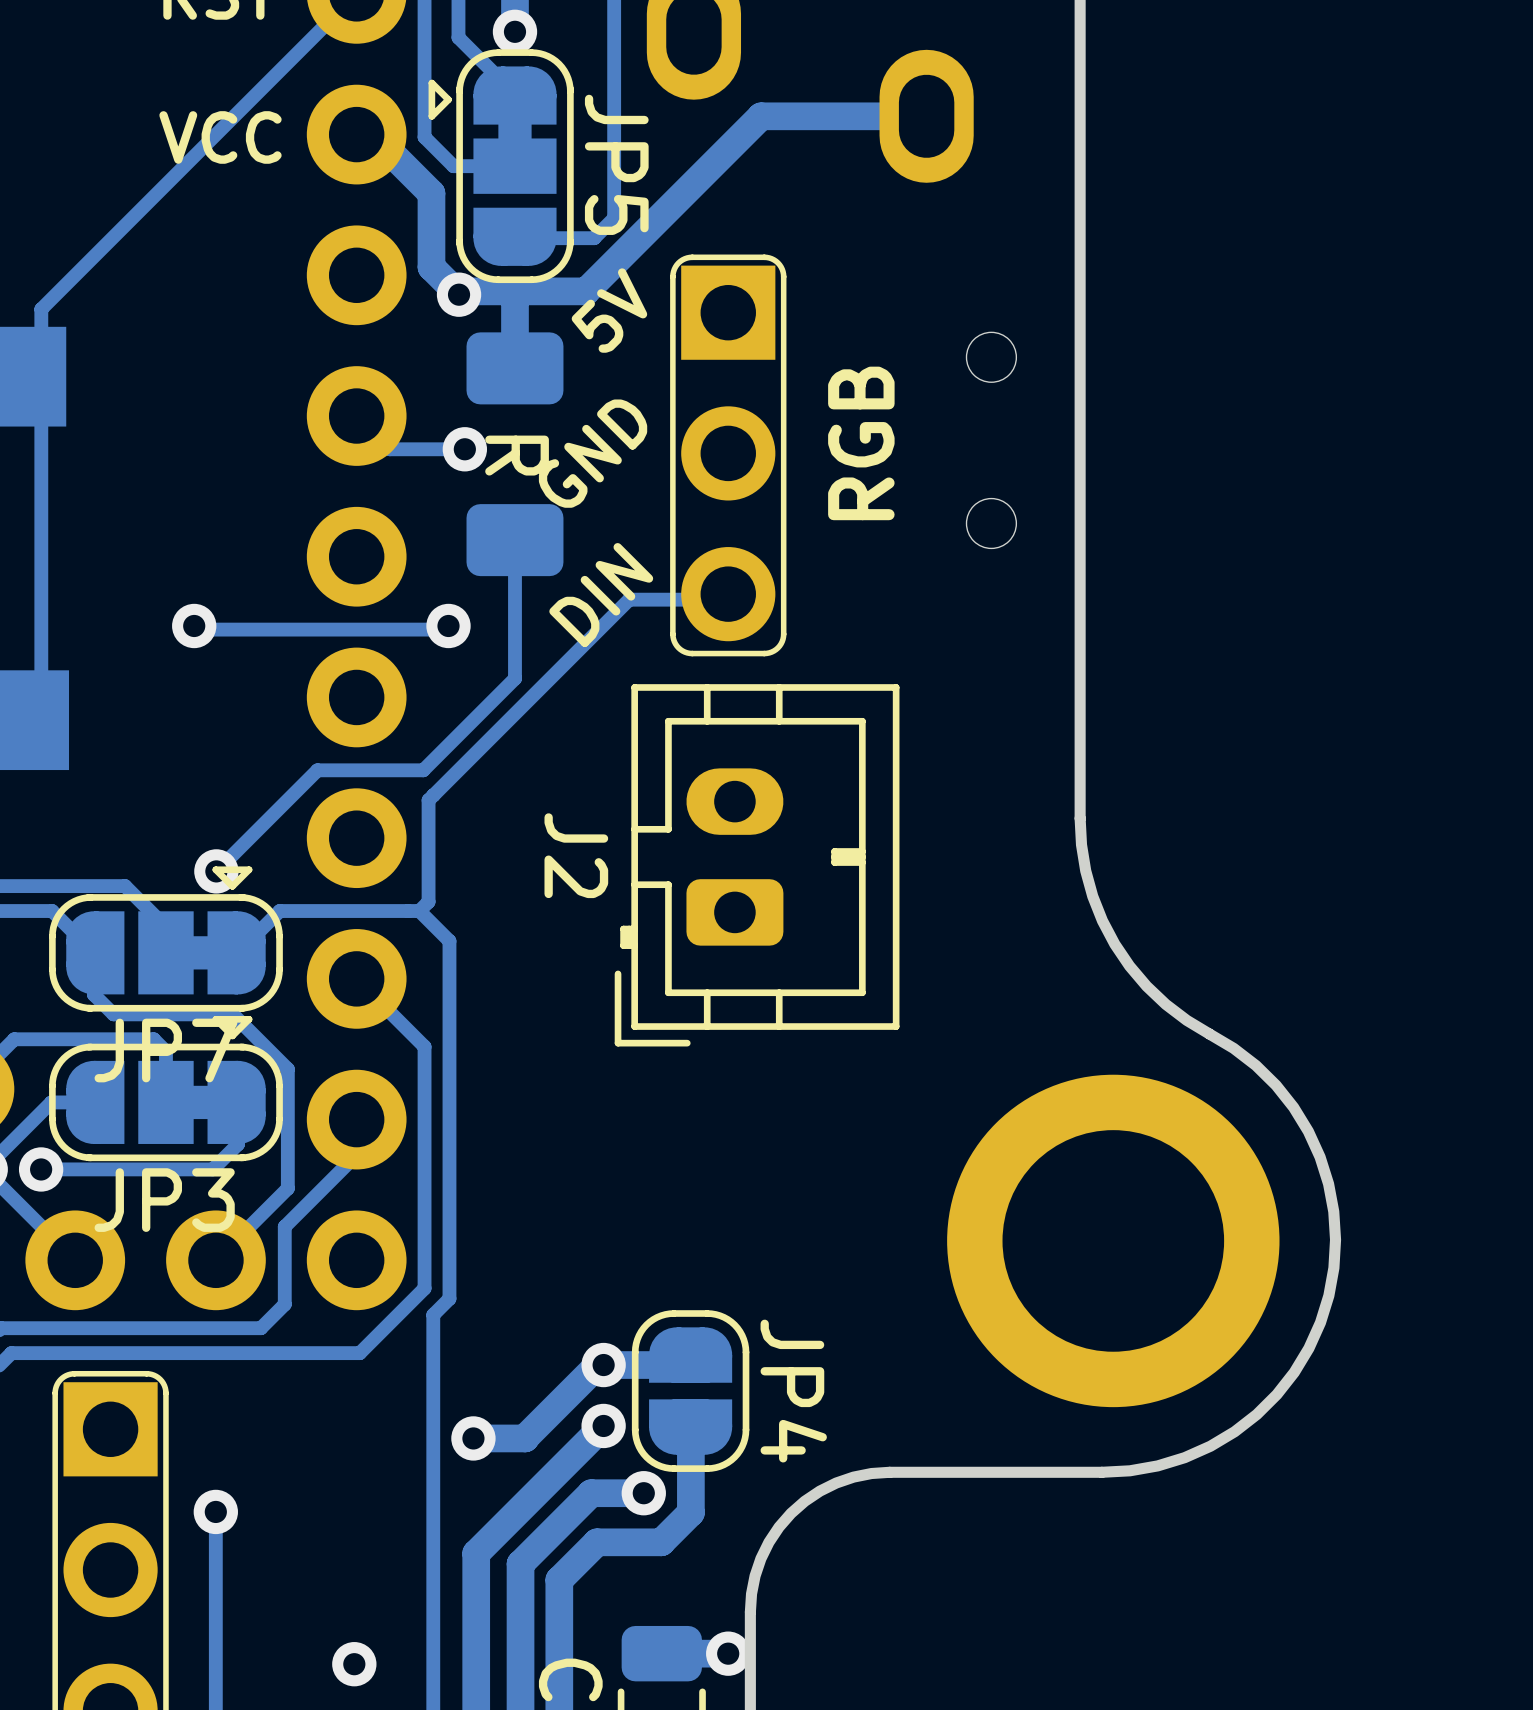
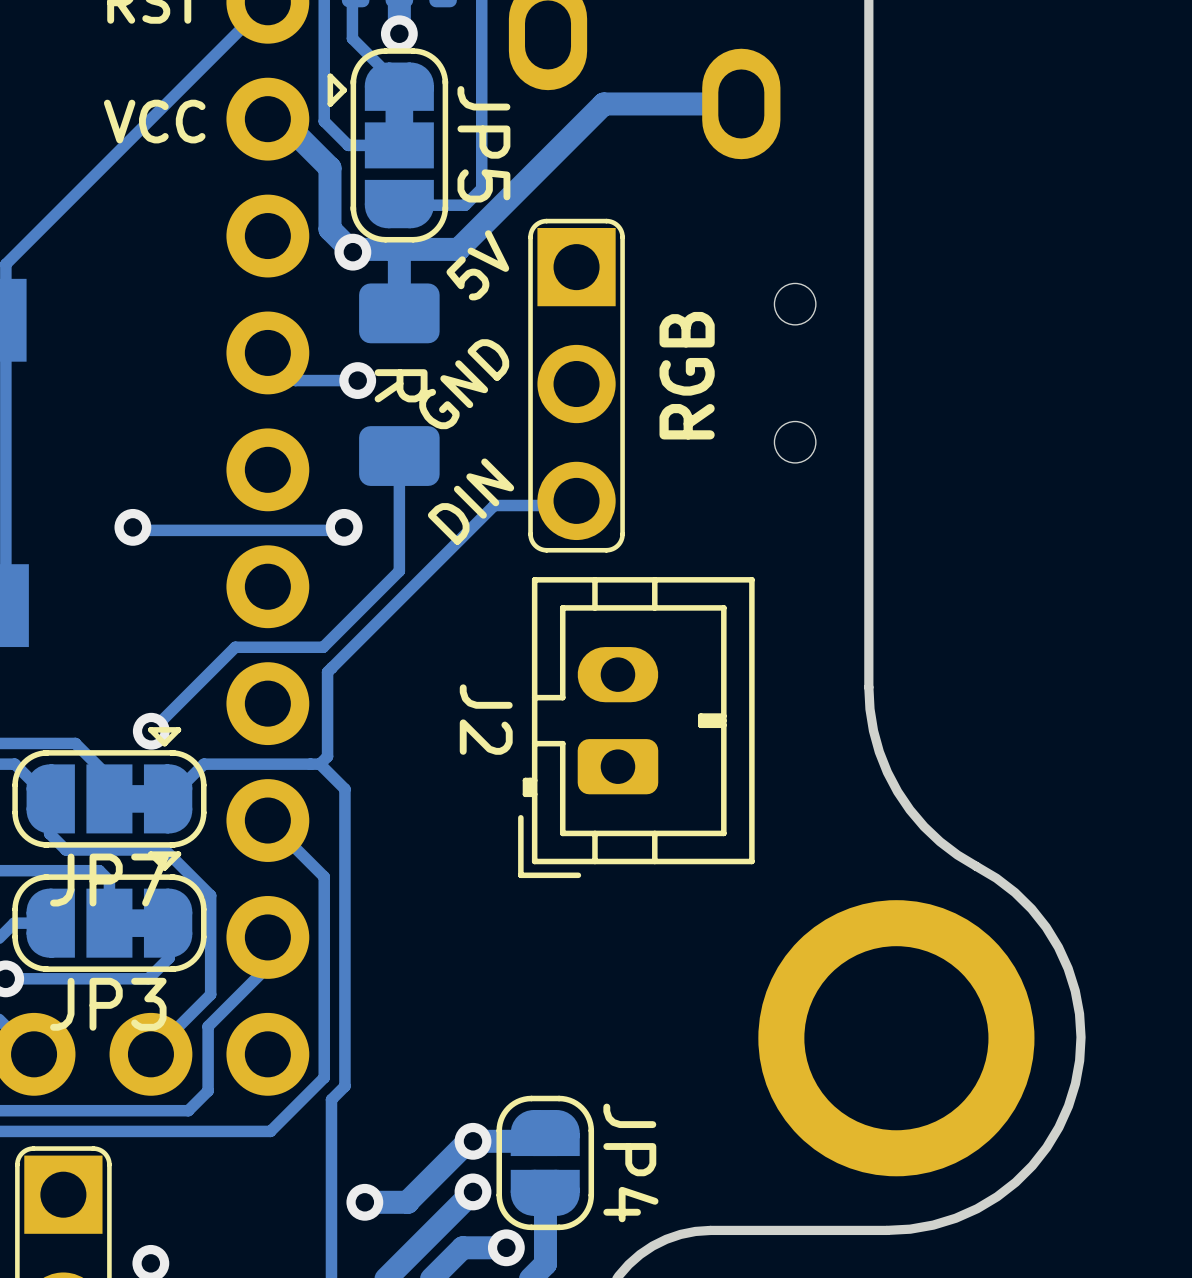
J2 position: (757, 865) -> (636, 727)

